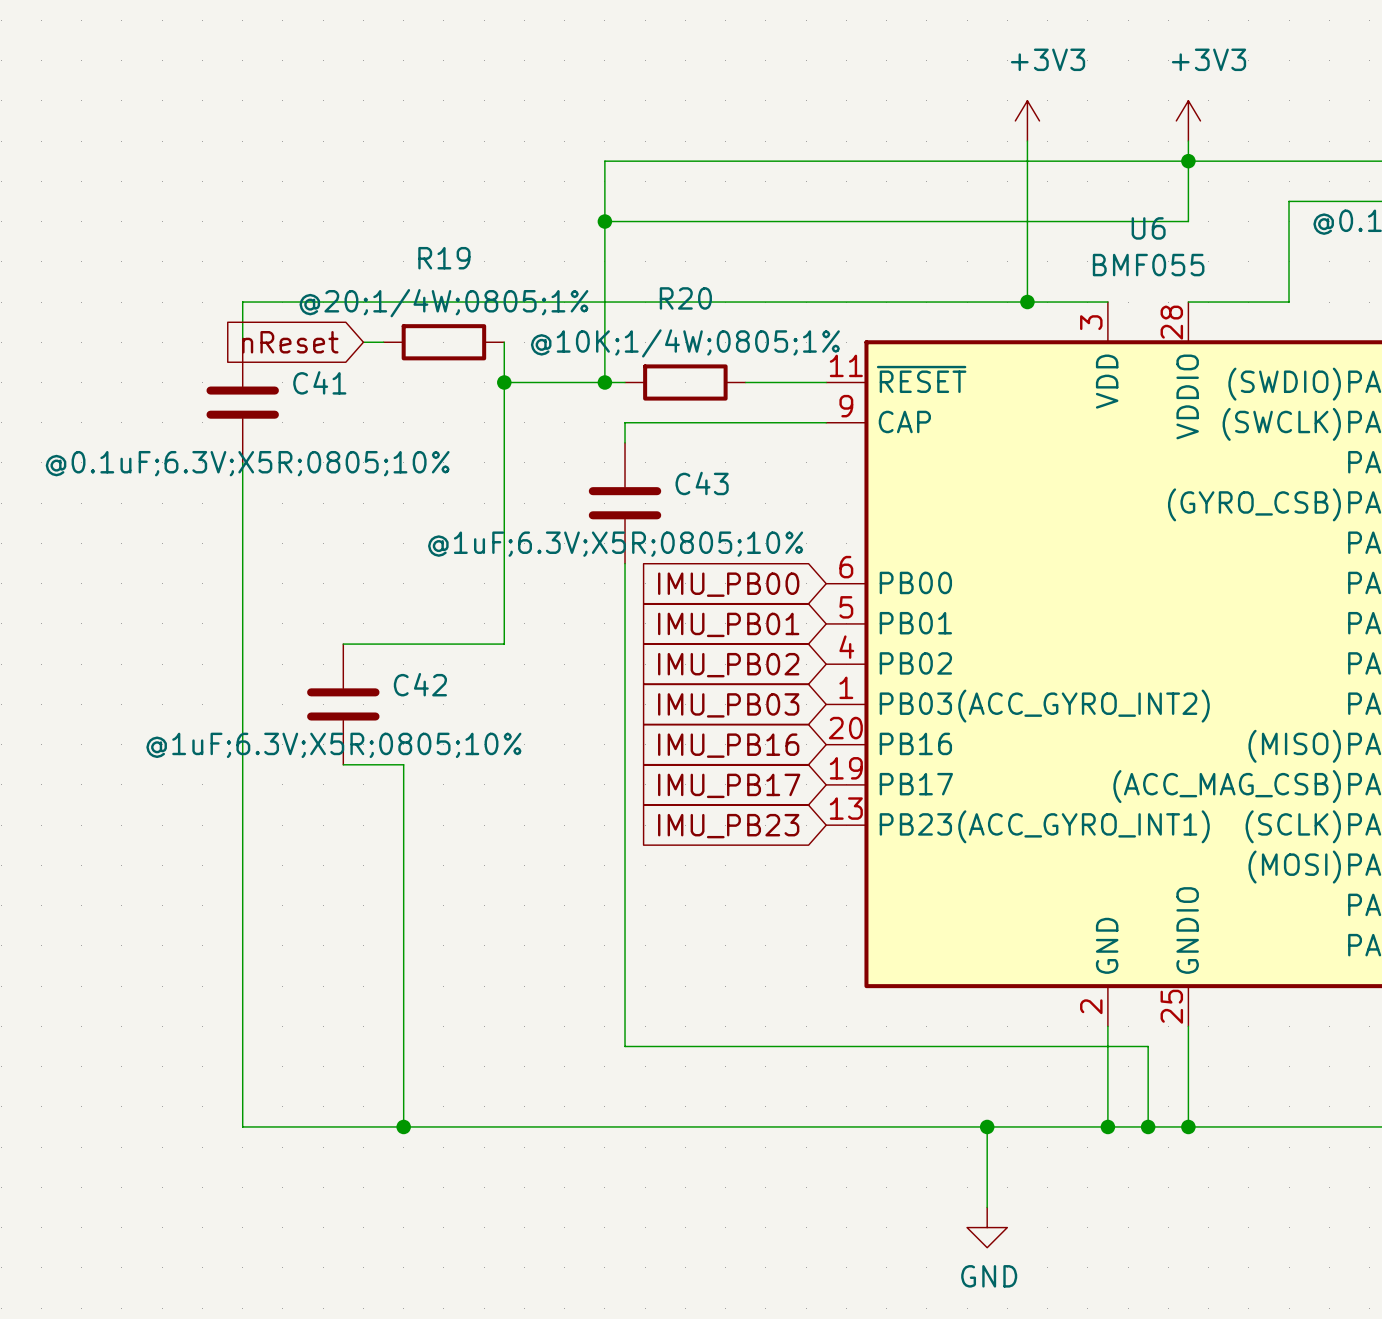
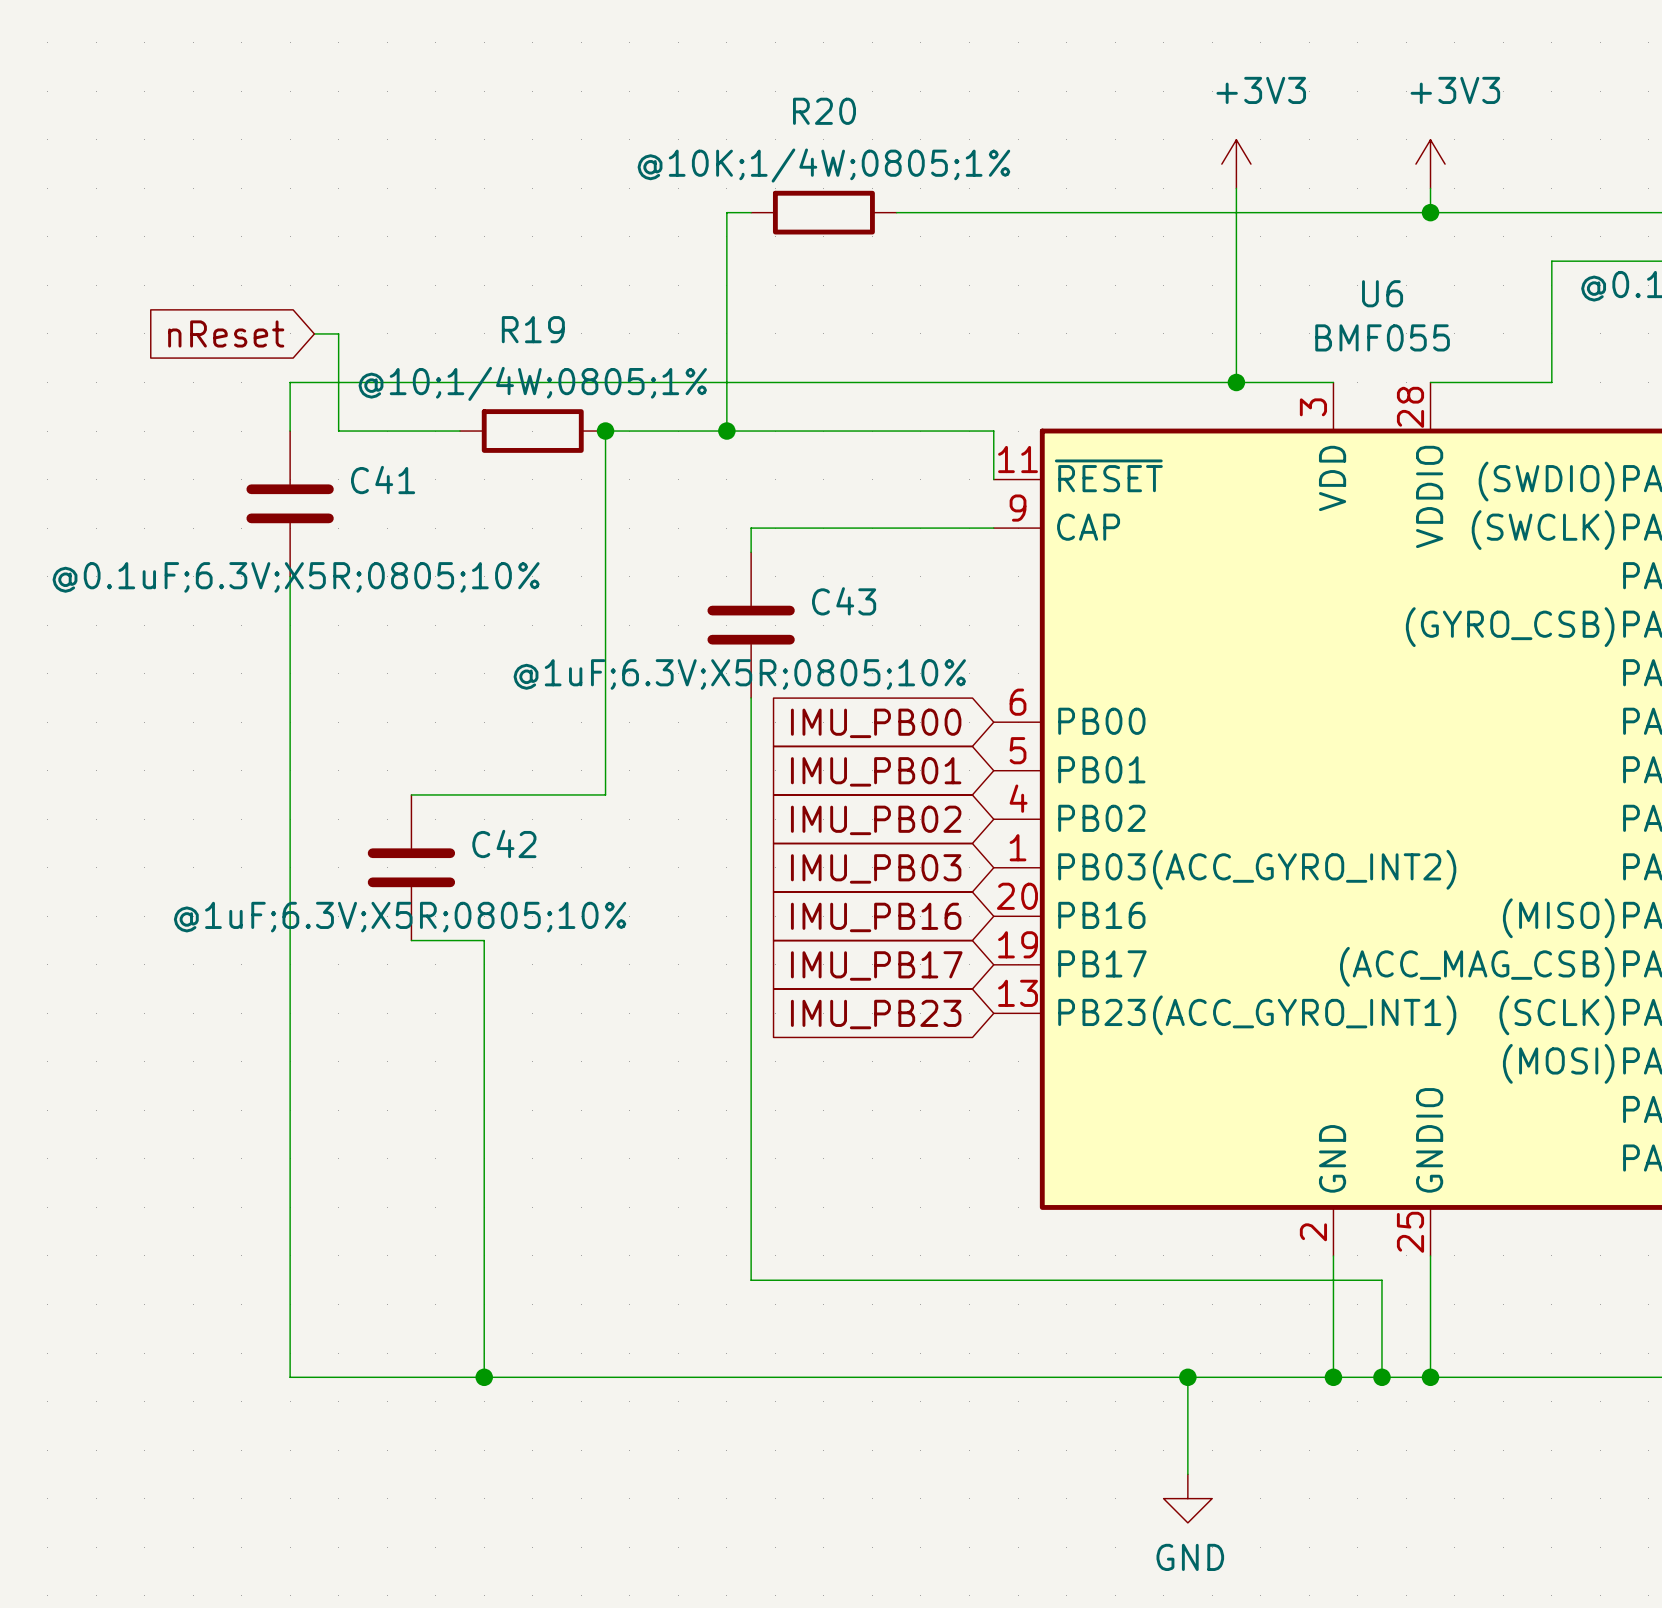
wire: (625, 161) (745, 161) -> none
wire: (1188, 161) (1188, 221) (604, 221) -> none
junction: (604, 221) -> none
wire: none -> (314, 333) (338, 333) (338, 431) (435, 431)
R19 value: @20;1/4W;0805;1% (443, 303) -> @10;1/4W;0805;1% (532, 383)
global label position: nReset (290, 342) -> nReset (226, 333)
wire: (604, 342) (604, 382) -> none
wire: (504, 382) (625, 382) -> none
junction position: (504, 382) -> (605, 431)
junction position: (604, 382) -> (726, 431)
R20 position: (685, 382) -> (823, 212)
wire: (745, 382) (826, 382) -> (605, 431) (993, 431) (993, 479)

